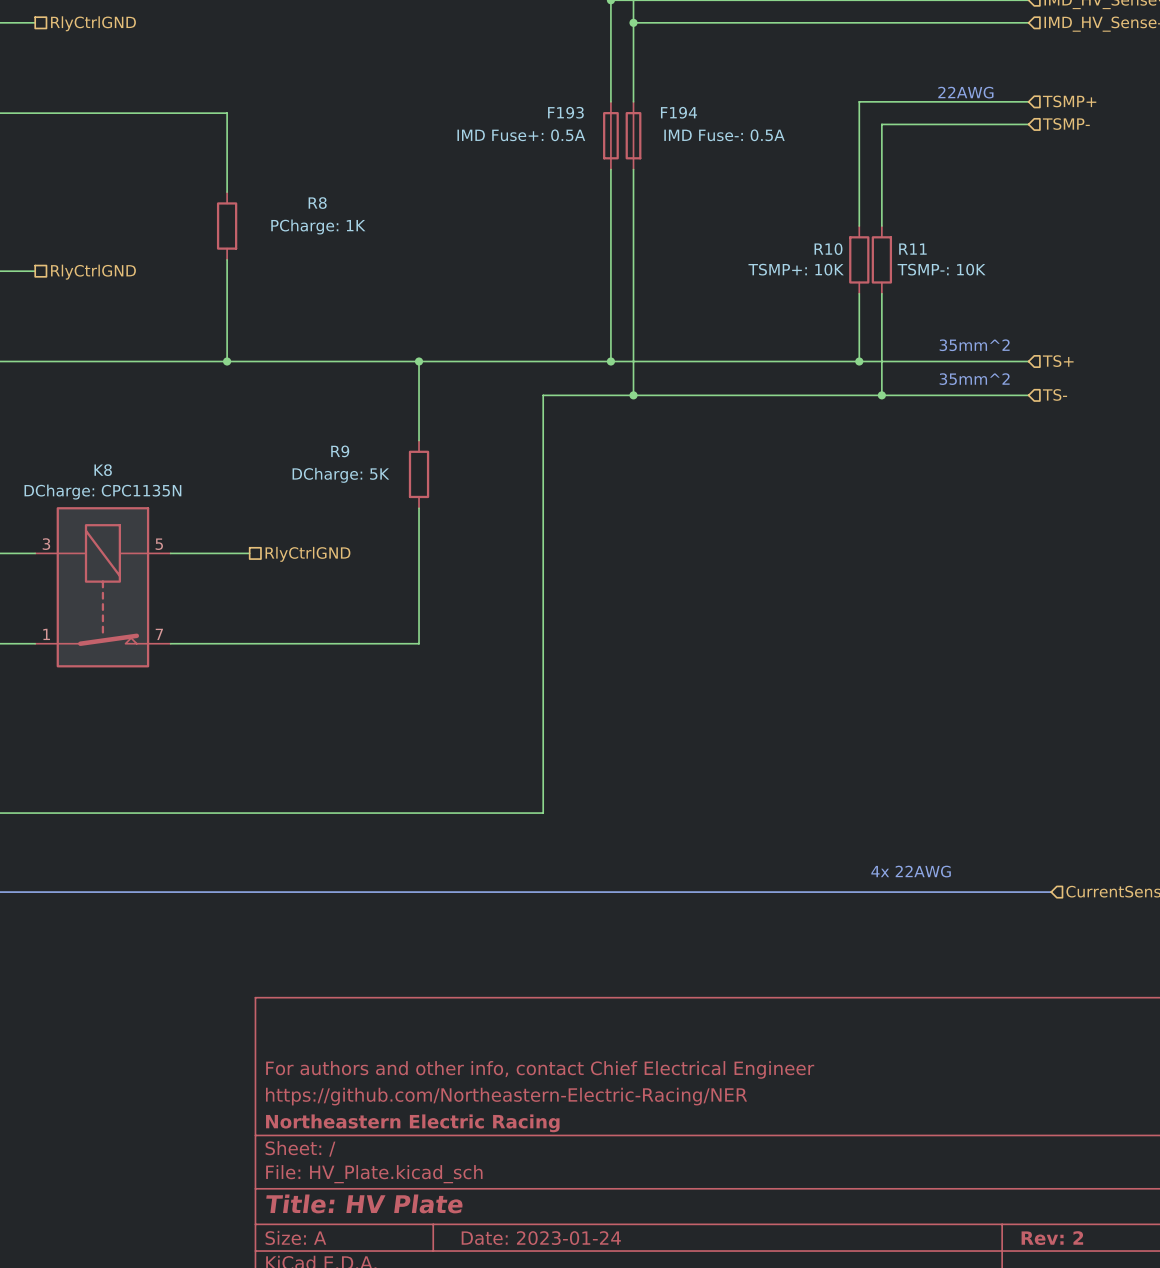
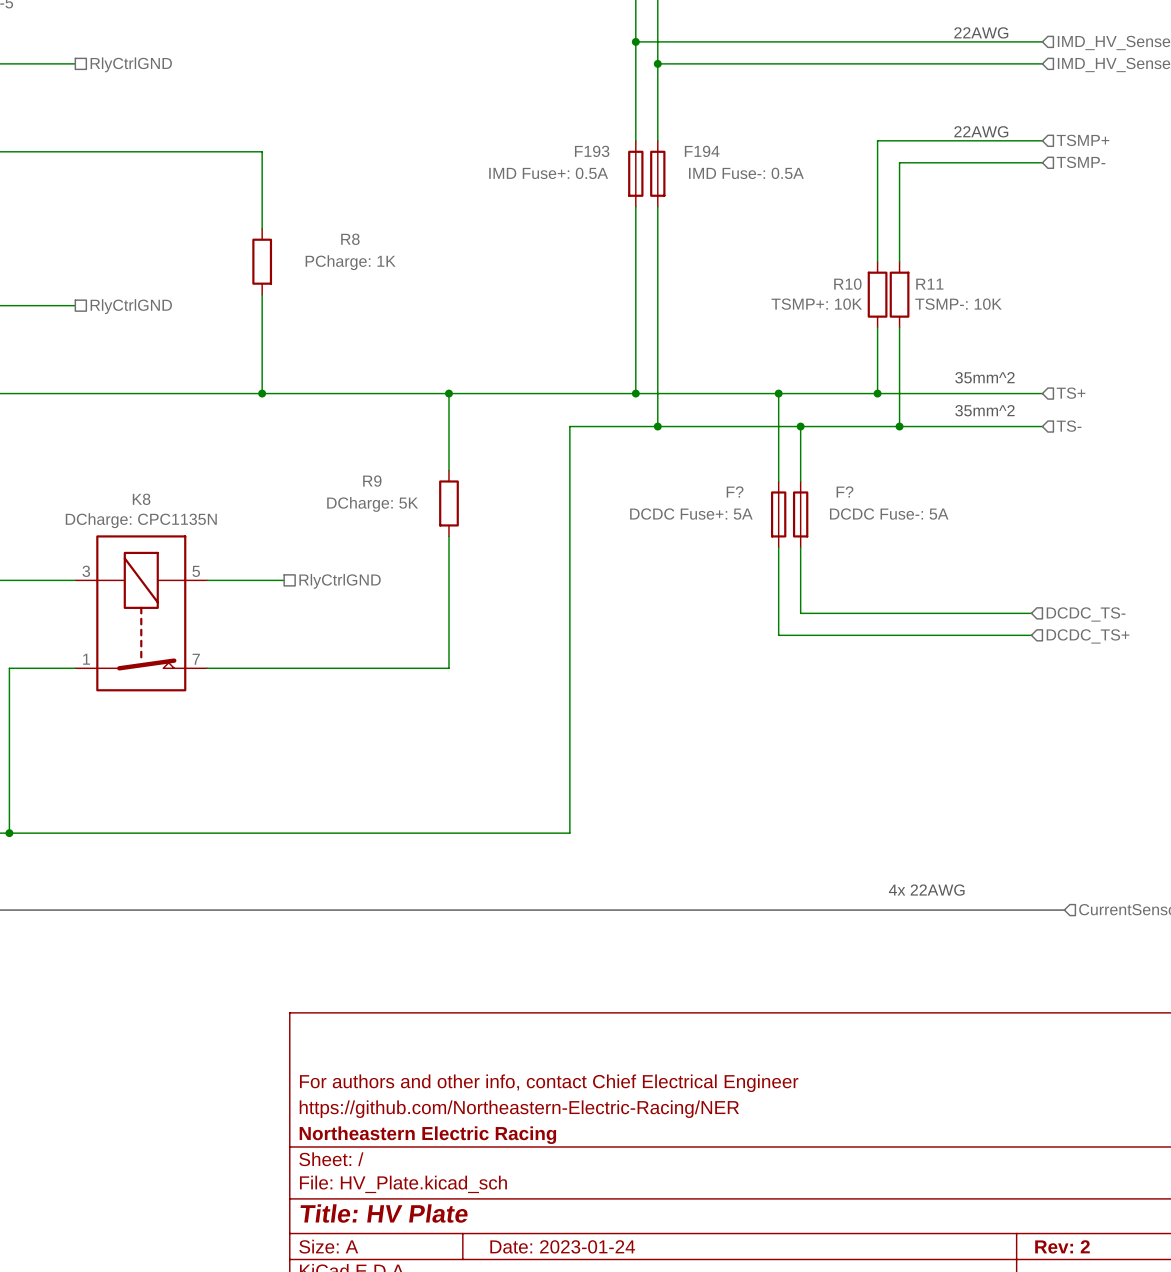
wire: none -> (778, 393) (778, 481)
junction: none -> (778, 393)
wire: none -> (800, 426) (800, 481)
junction: none -> (800, 426)
F?: none -> DCDC Fuse+: 5A (778, 514)
F?: none -> DCDC Fuse-: 5A (800, 514)
wire: none -> (778, 547) (778, 635) (1031, 635)
wire: none -> (800, 547) (800, 613) (1031, 613)
hierarchical label: none -> DCDC_TS- (1086, 614)
hierarchical label: none -> DCDC_TS+ (1088, 636)

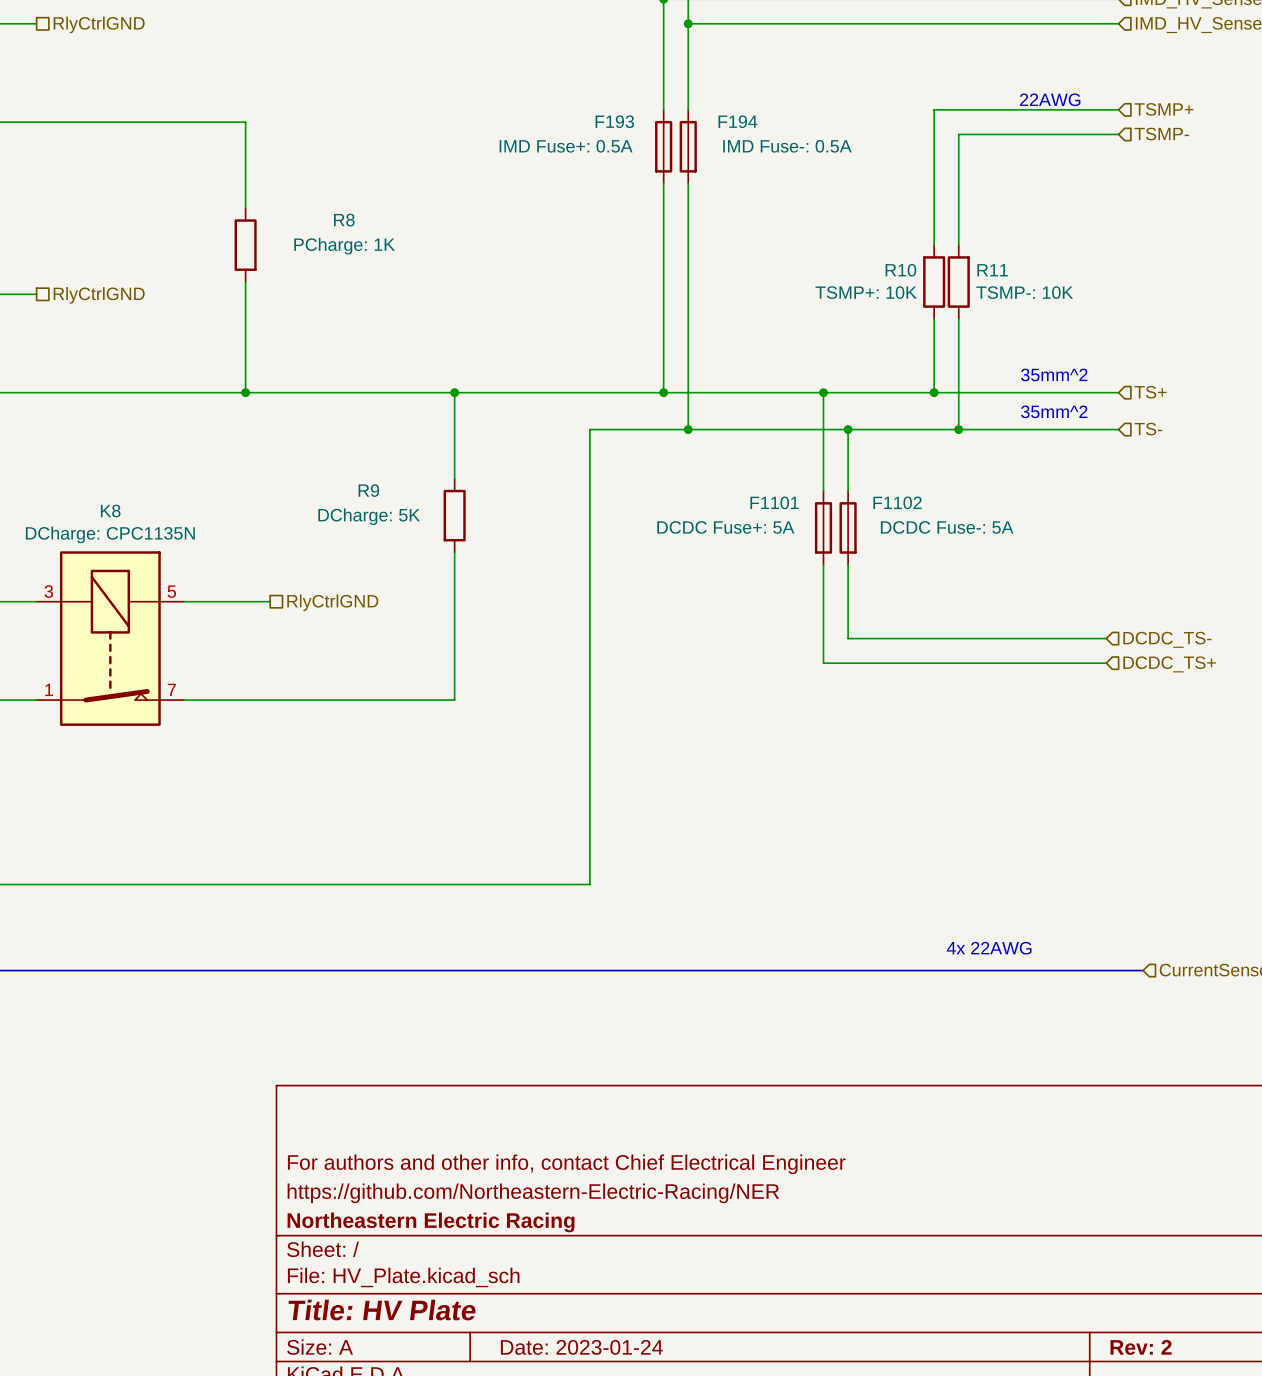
F? name: F? (735, 491) -> F1101 (774, 502)
F? name: F? (844, 491) -> F1102 (897, 502)

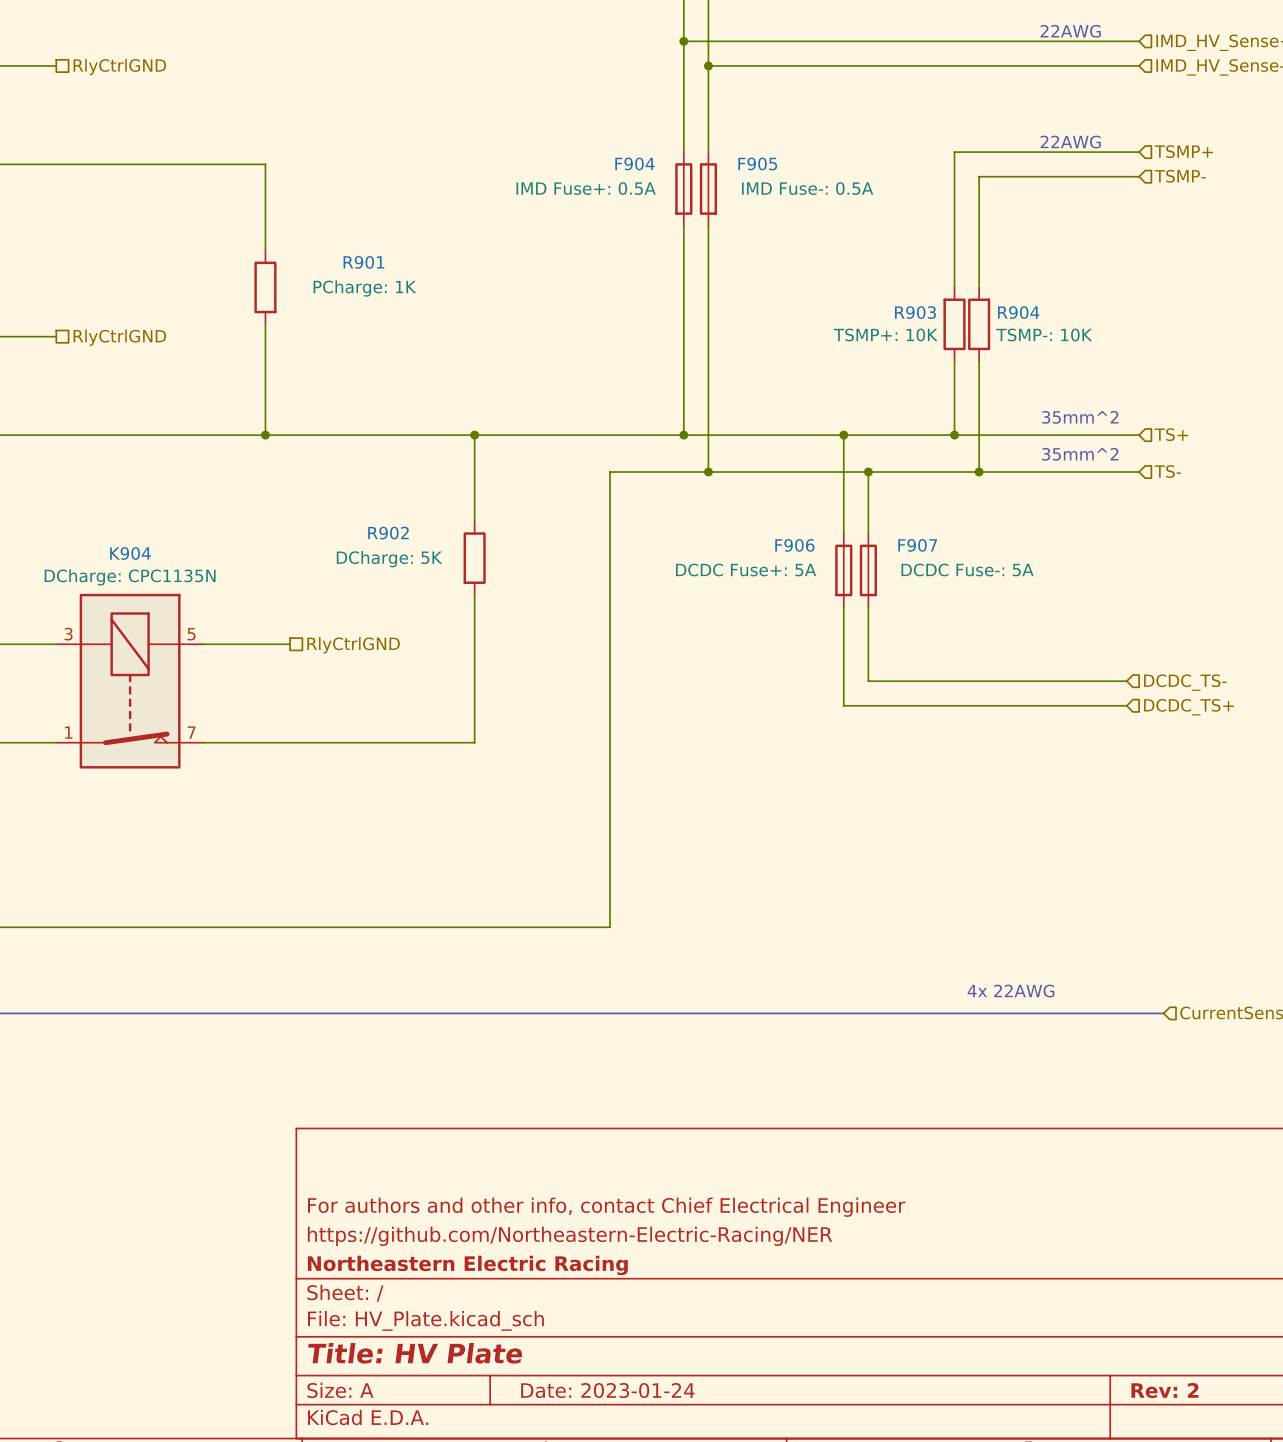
F193 name: F193 (614, 121) -> F904 (634, 163)
F194 name: F194 (737, 121) -> F905 (757, 163)
R8 name: R8 (344, 220) -> R901 (363, 262)
R10 name: R10 (900, 270) -> R903 (915, 312)
R11 name: R11 (992, 270) -> R904 (1018, 312)
R9 name: R9 (368, 490) -> R902 (388, 533)
F1101 name: F1101 (774, 502) -> F906 (794, 545)
F1102 name: F1102 (897, 502) -> F907 (917, 545)
K8 name: K8 (110, 510) -> K904 (130, 553)

